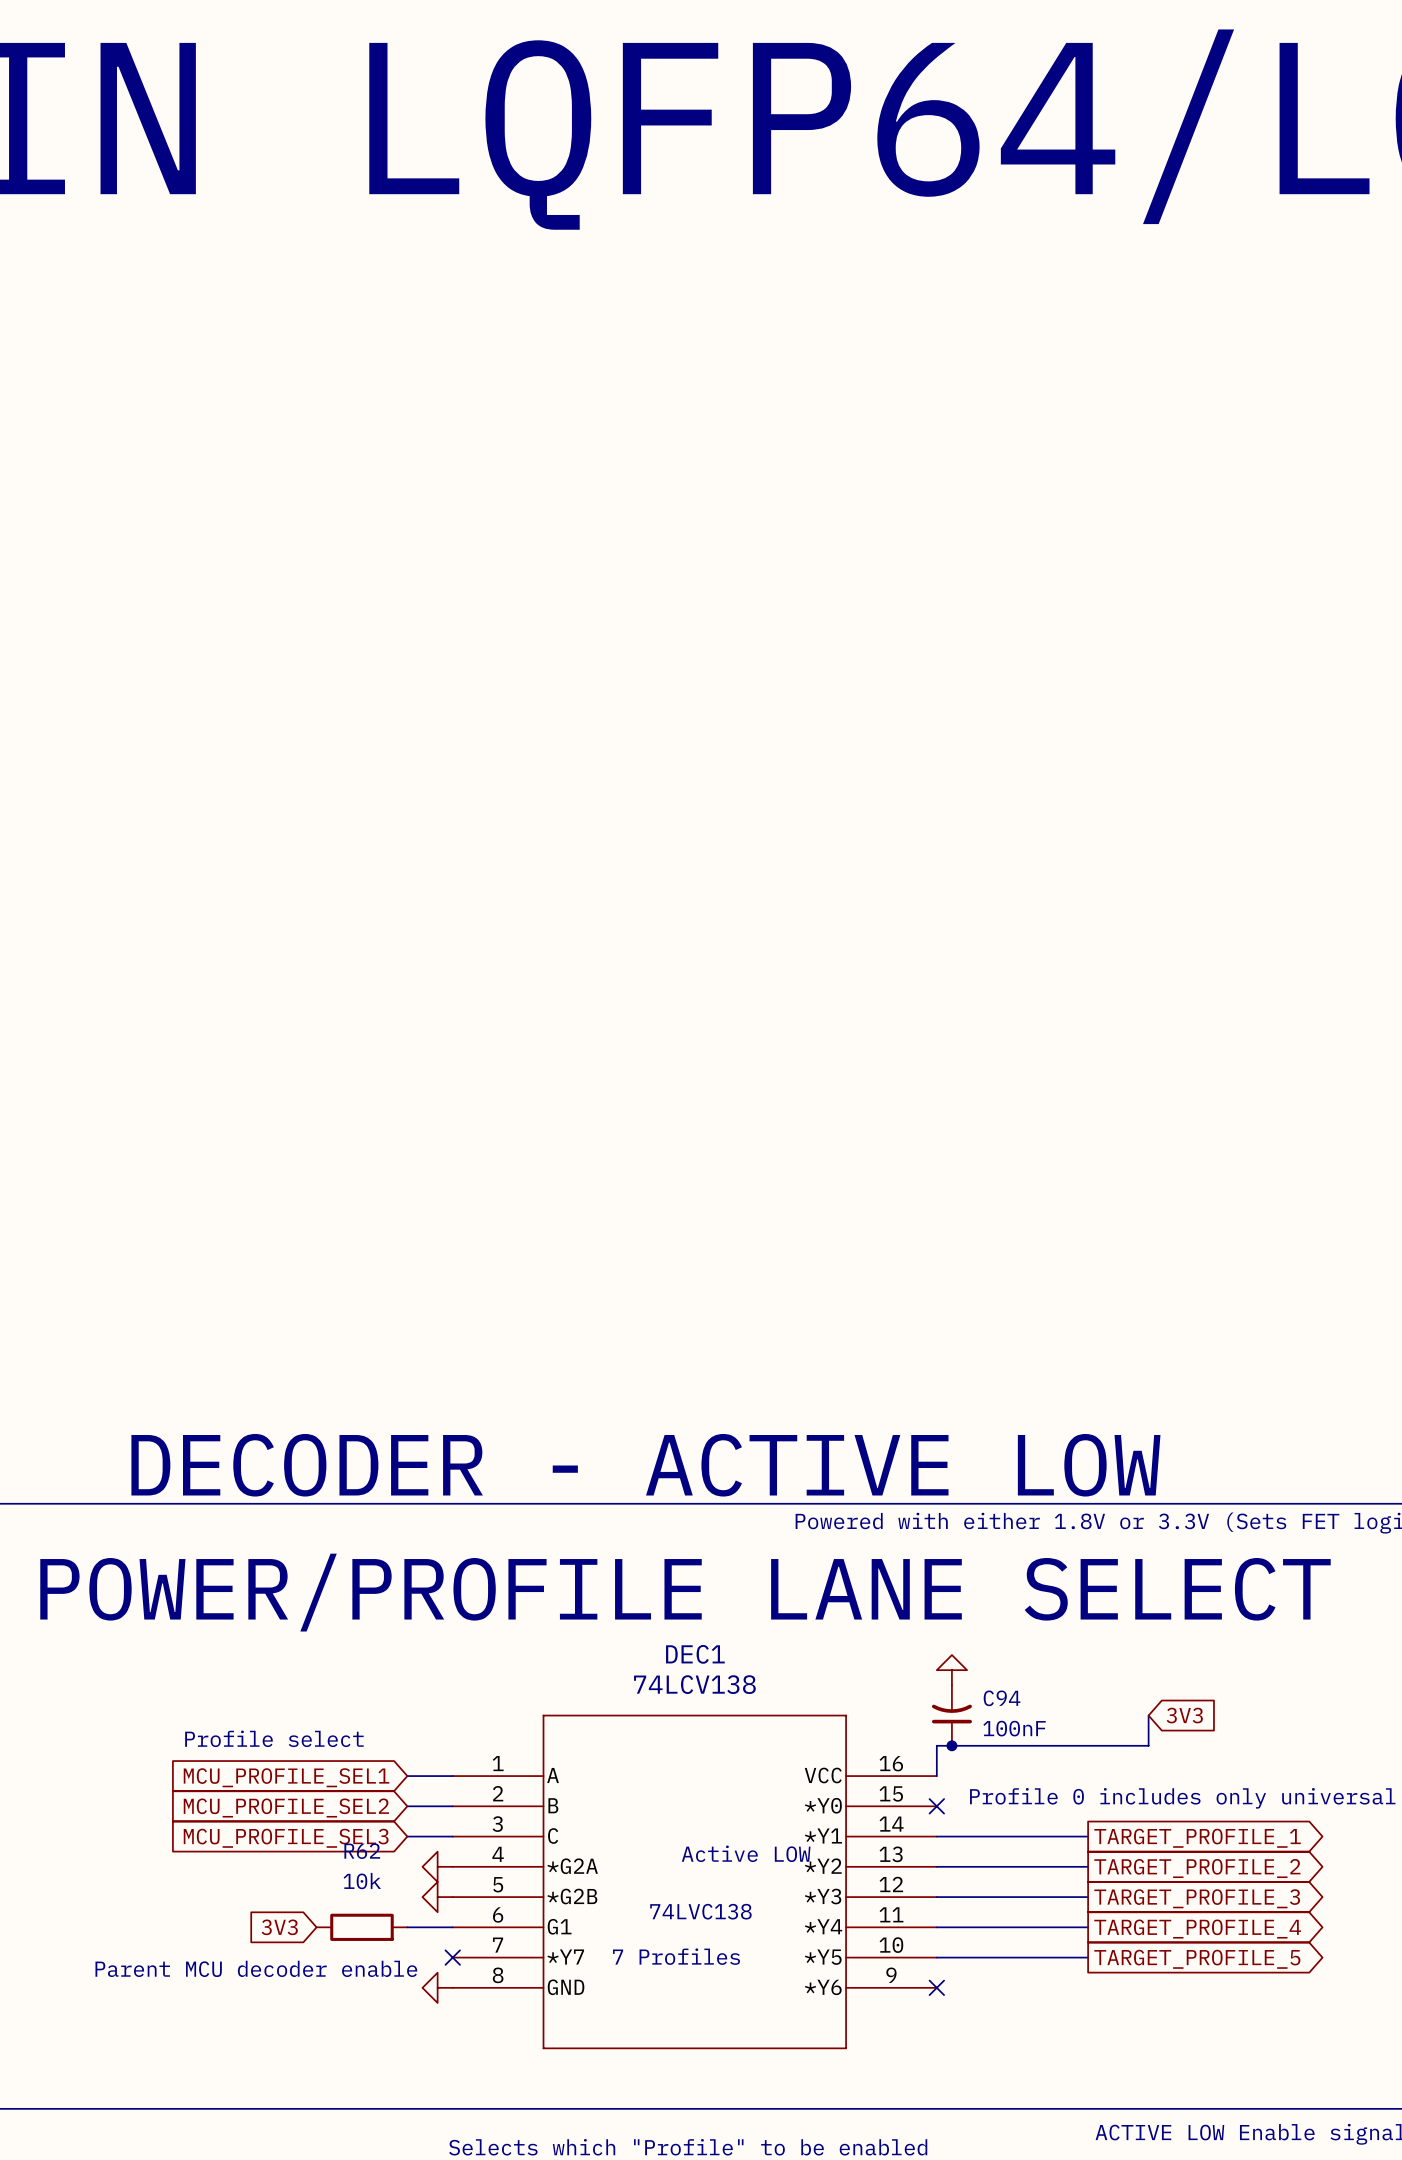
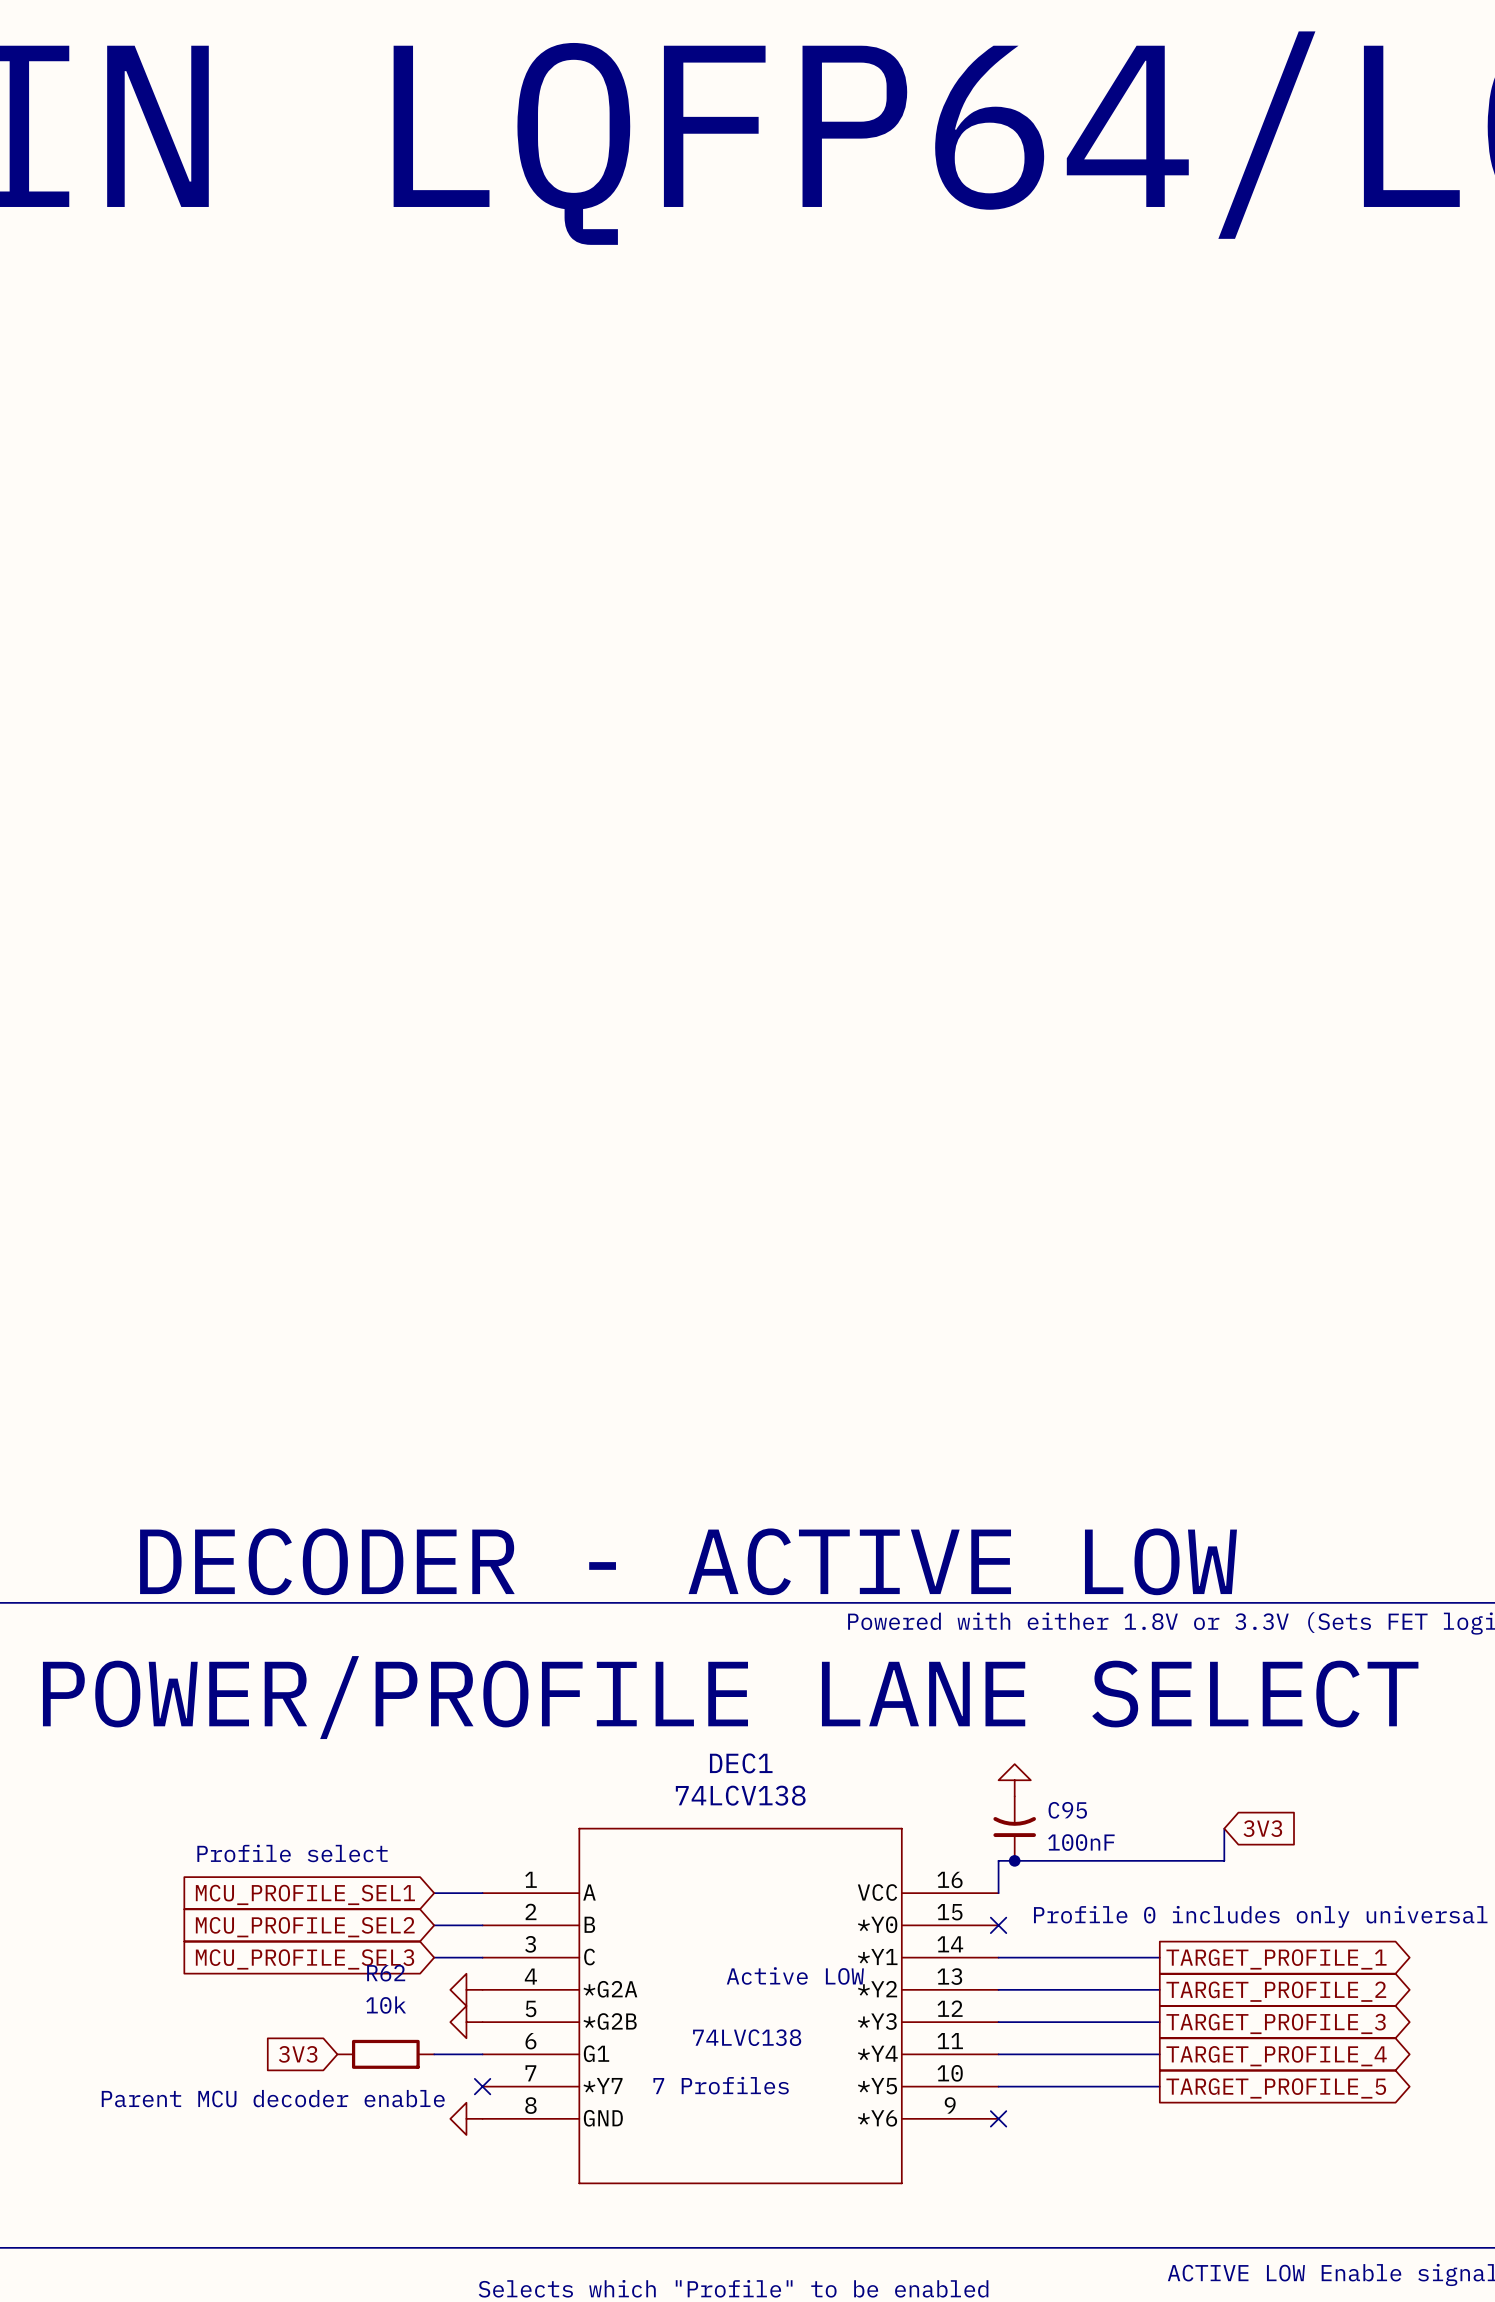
C94 name: C94 (1002, 1698) -> C95 (1067, 1810)

